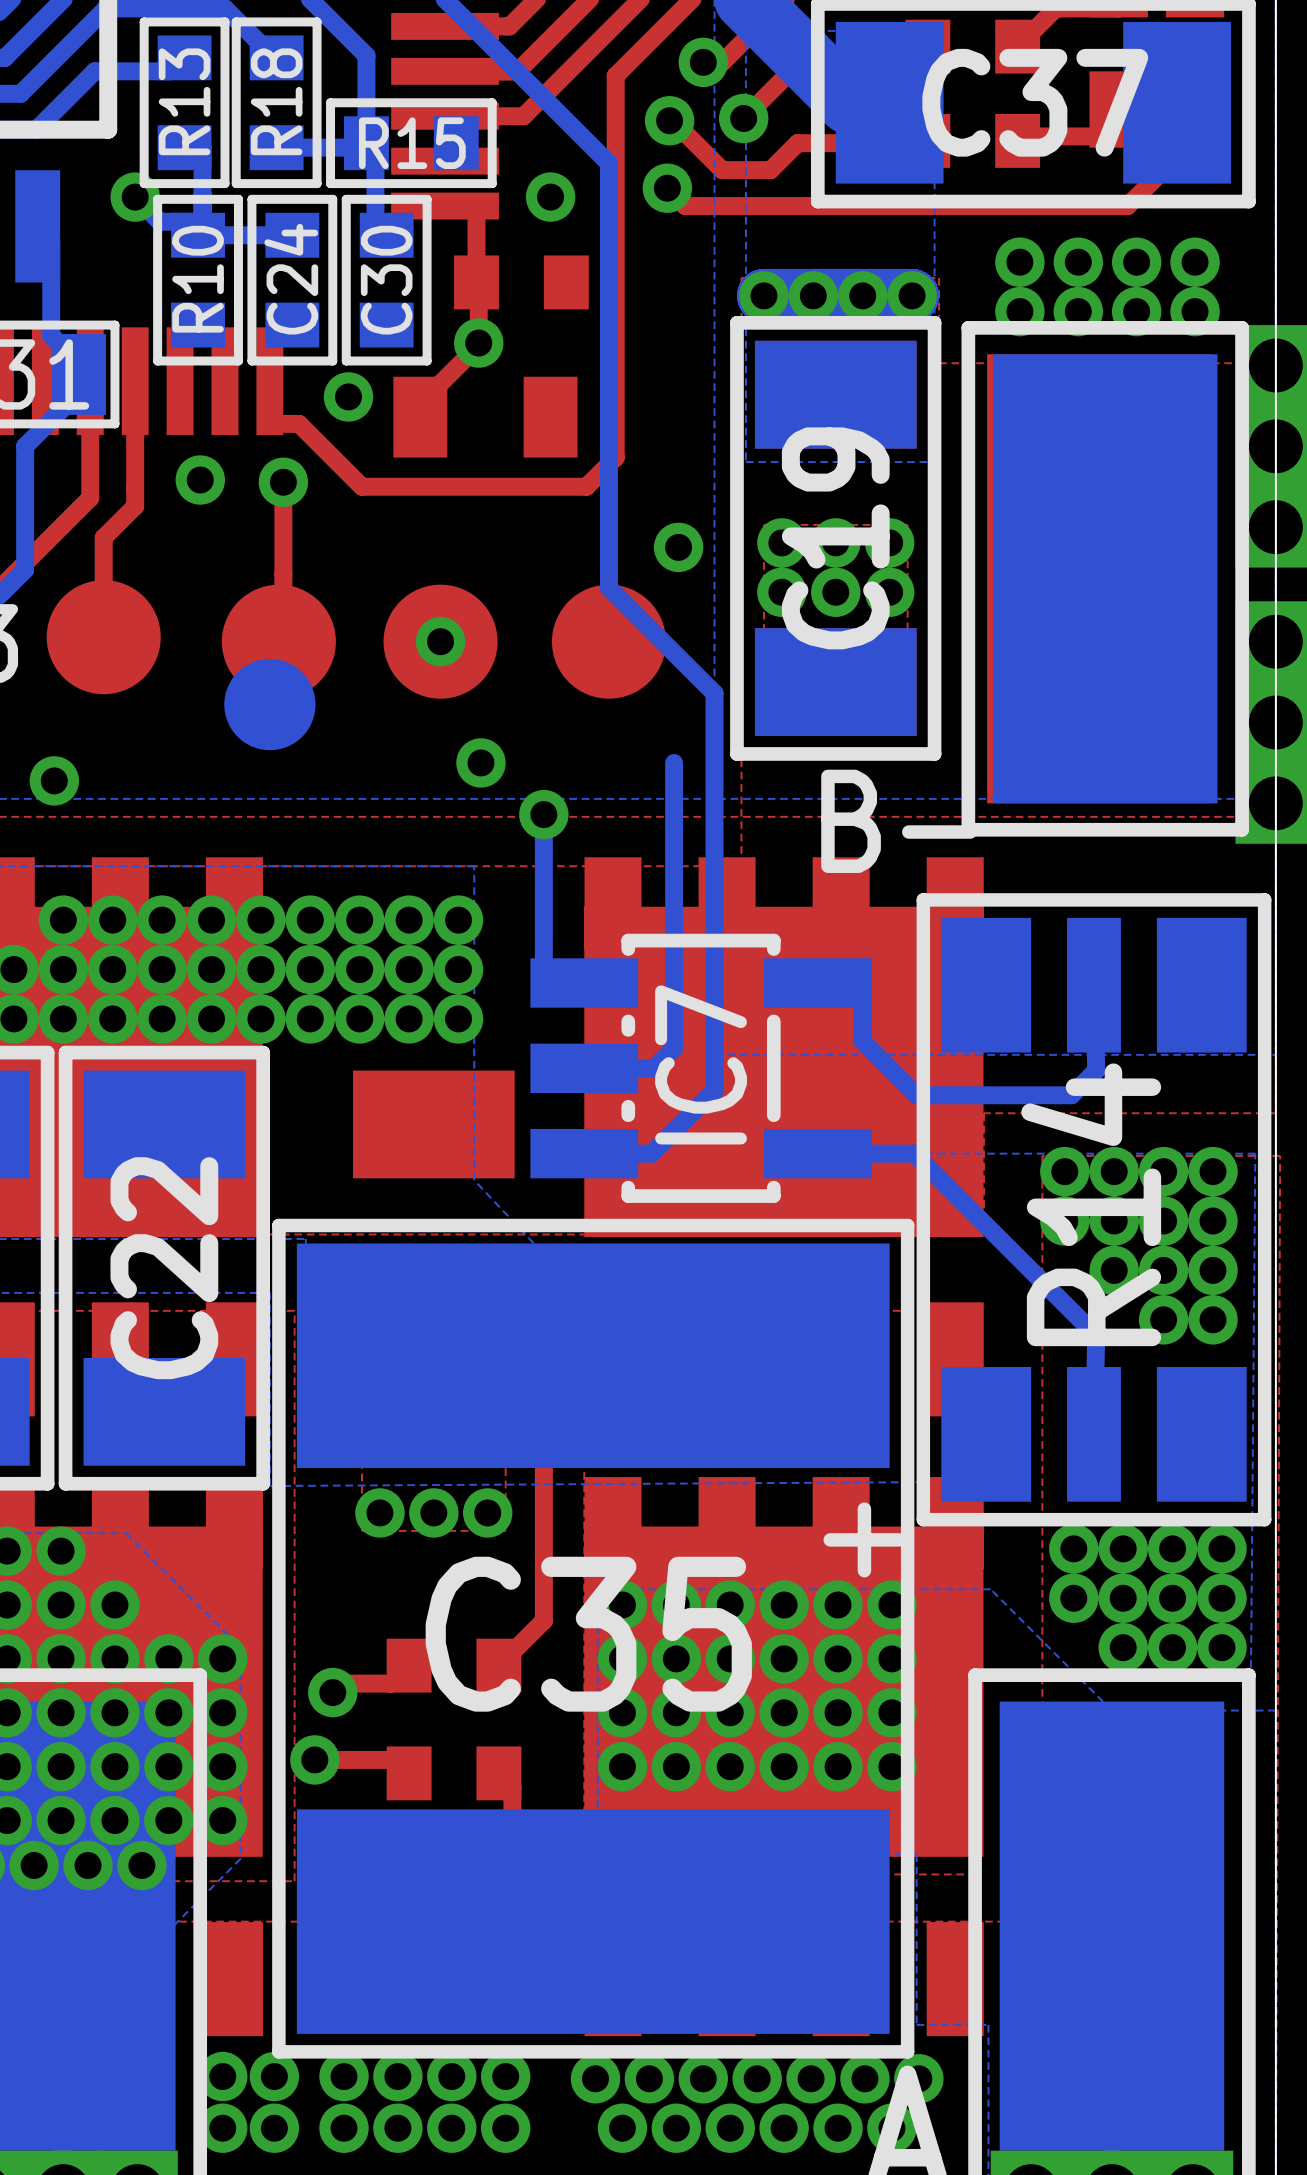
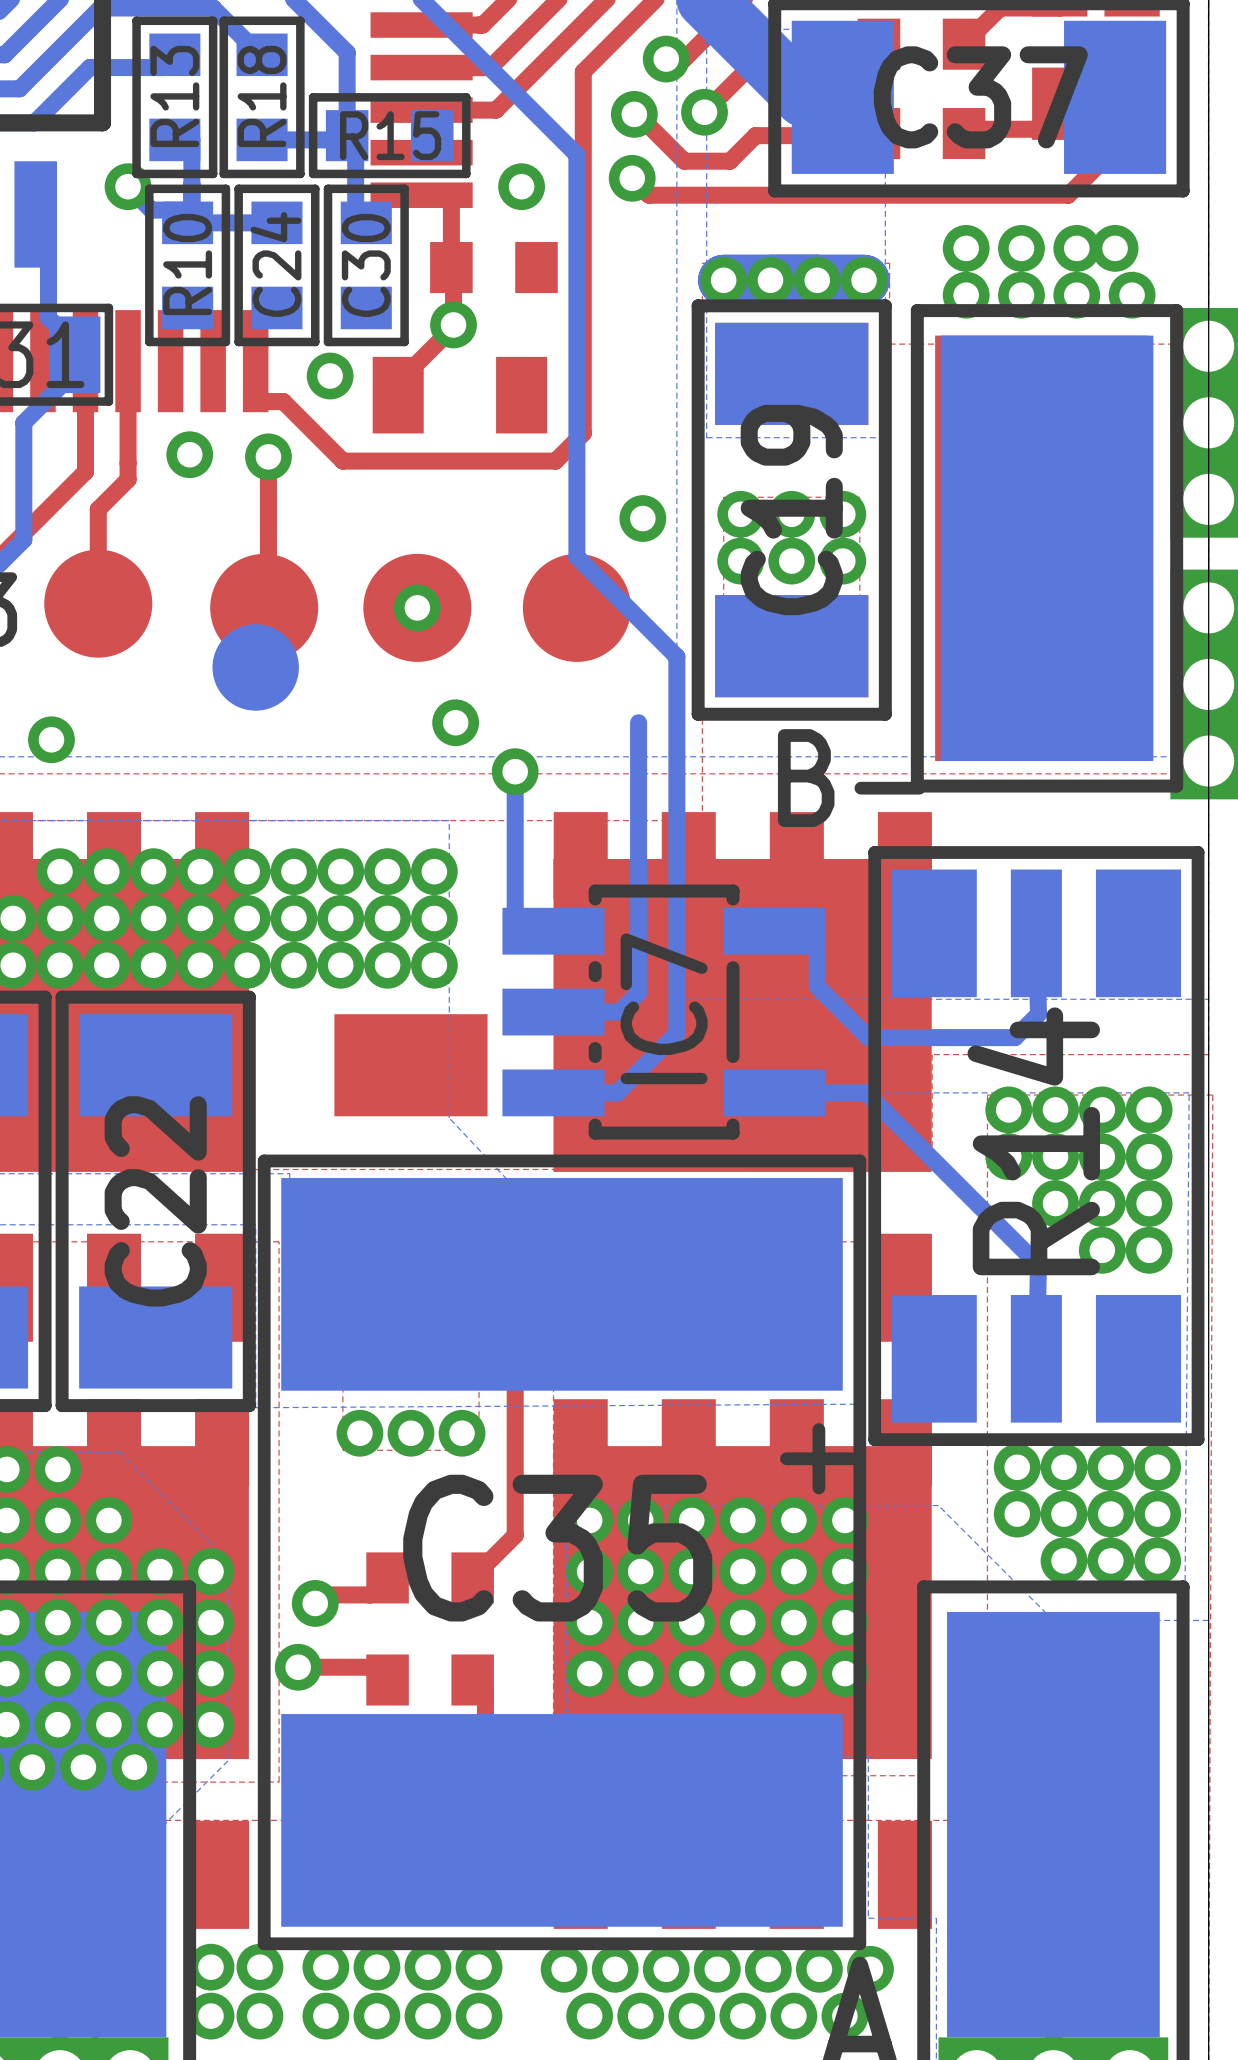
via position: (1195, 262) -> (1115, 248)

